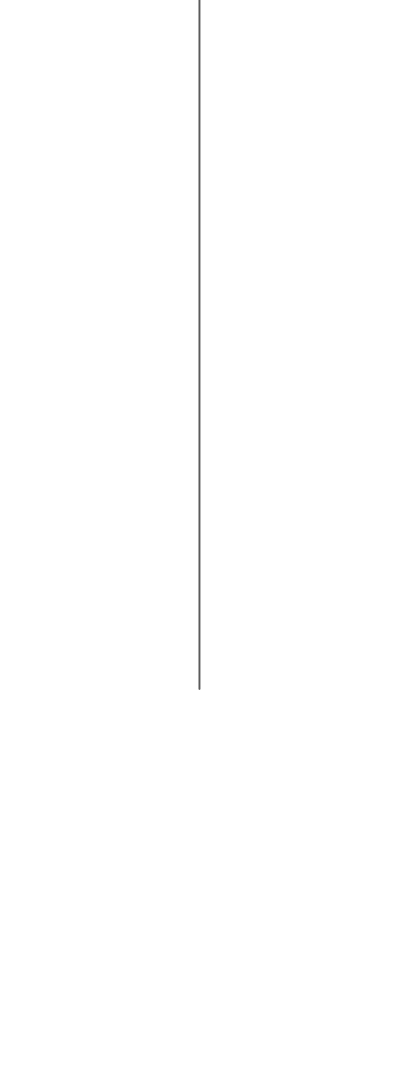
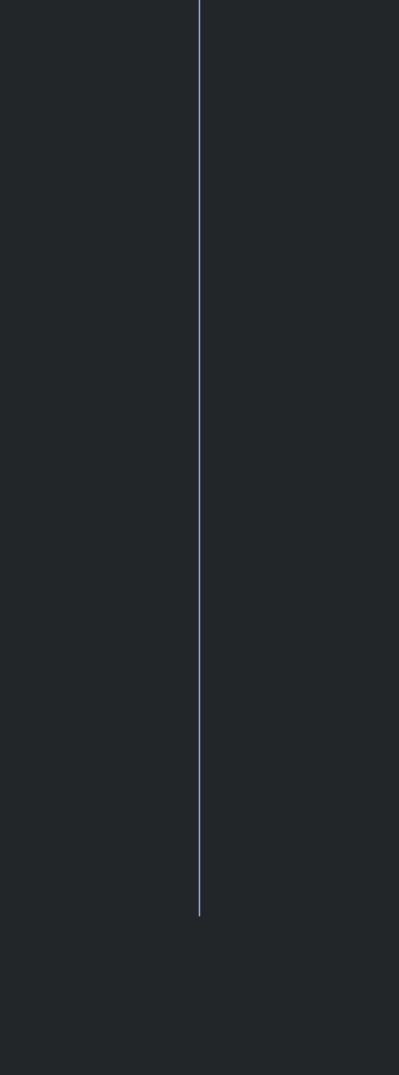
bus: none -> (199, 688) (199, 915)

